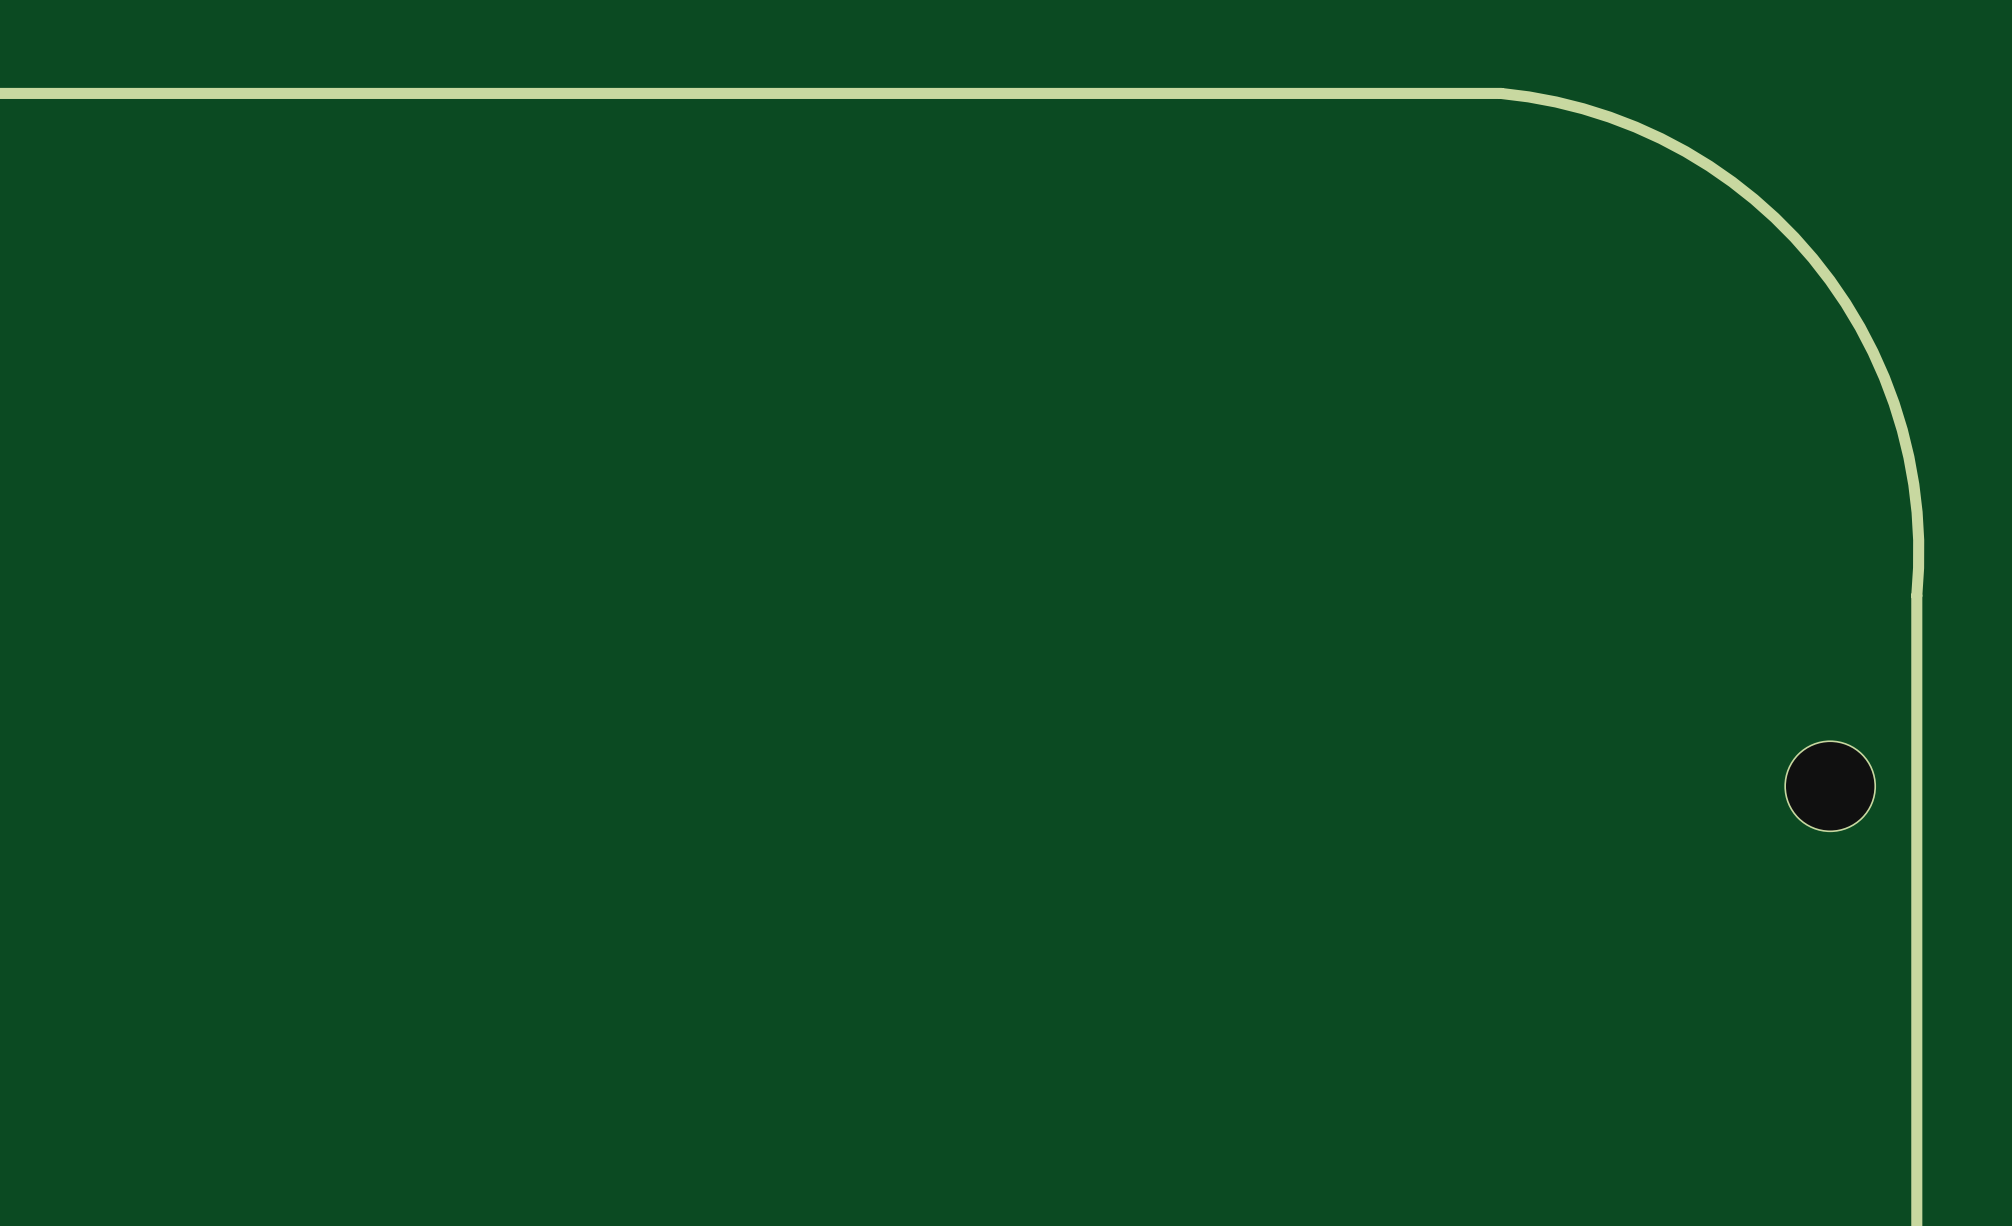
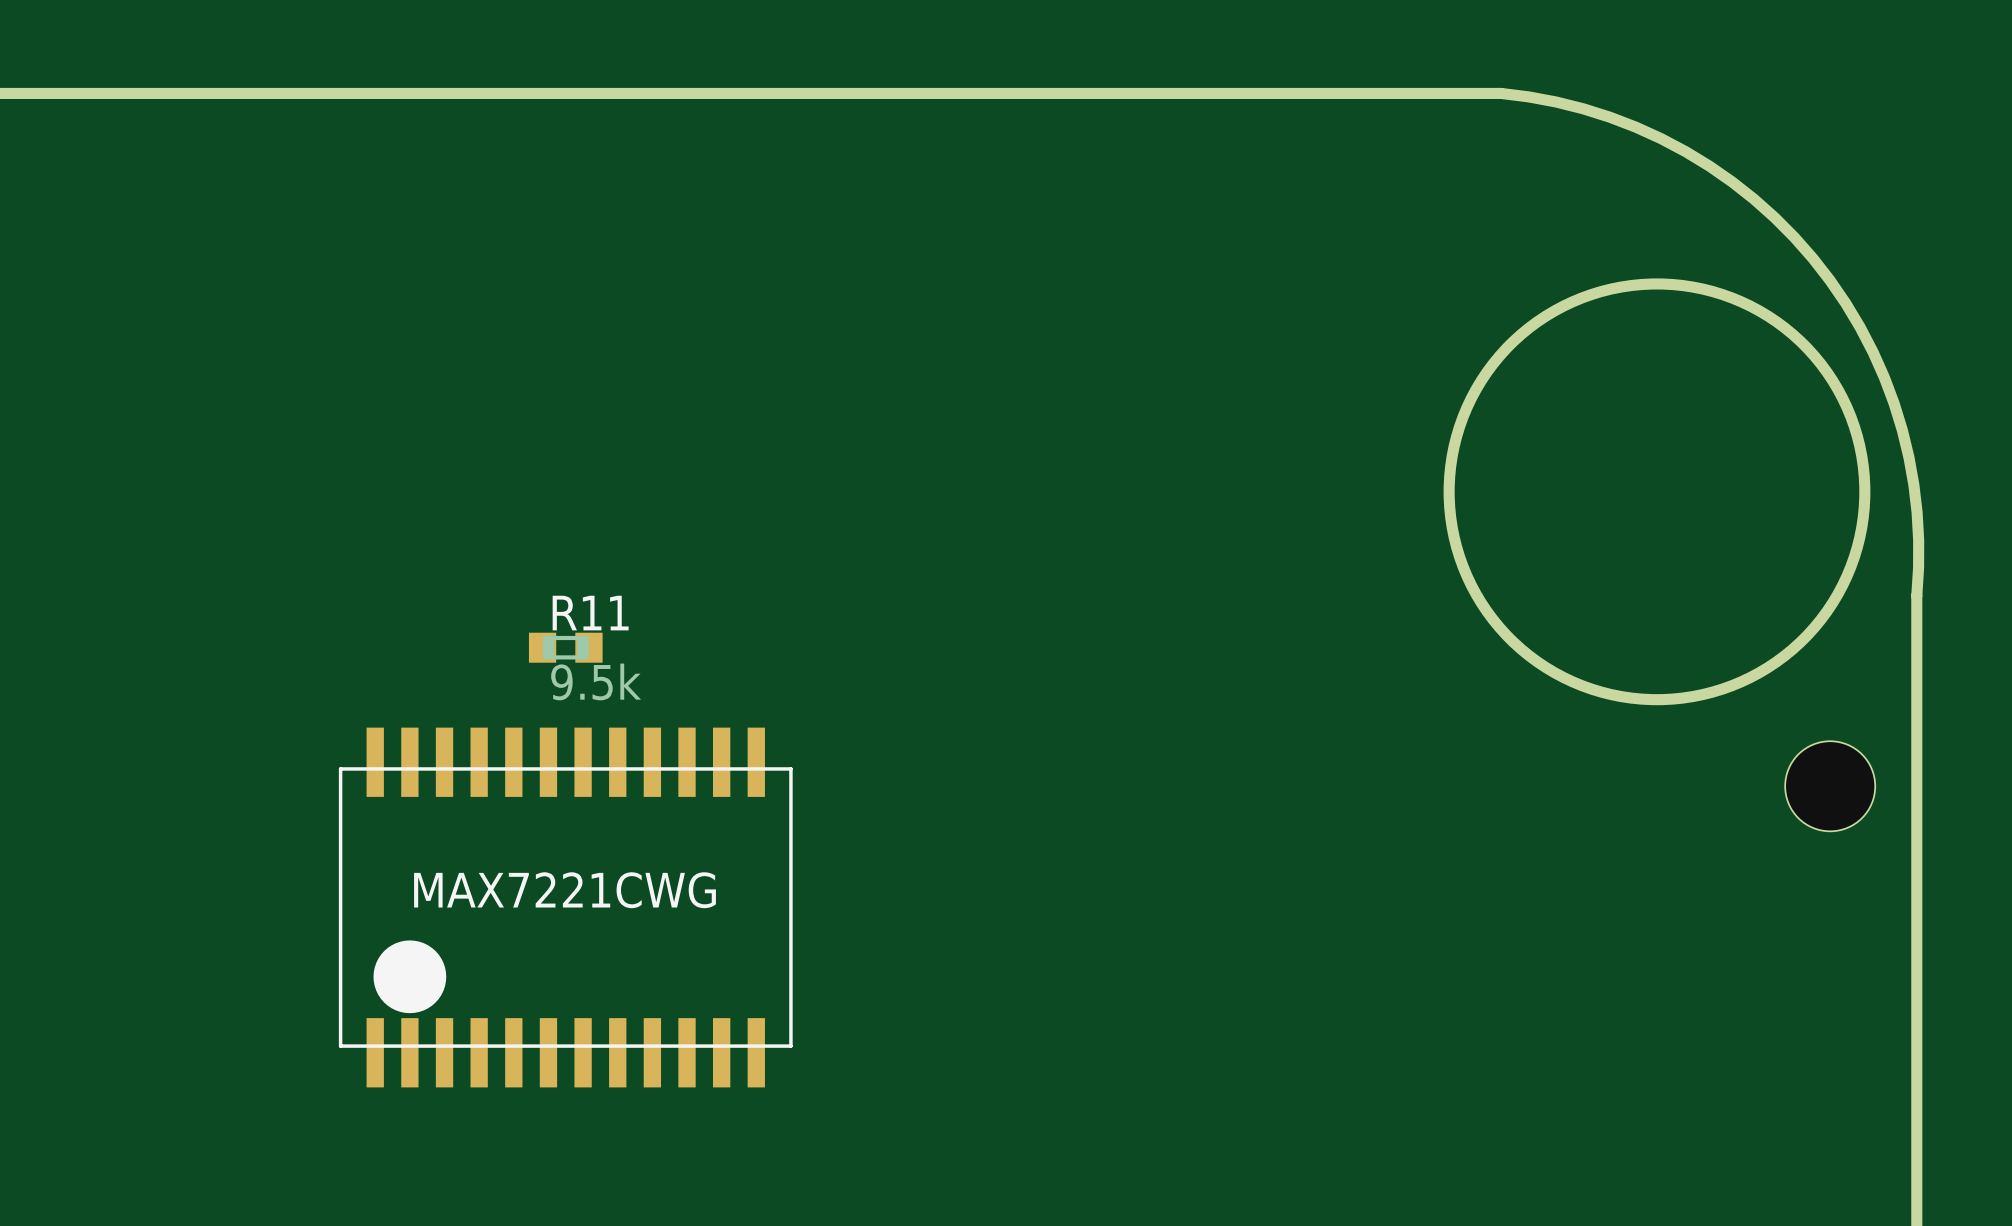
round board edge: none -> [1443, 278, 1871, 706]
R11: none -> 9.5k (565, 647)
part: none -> (565, 907)

